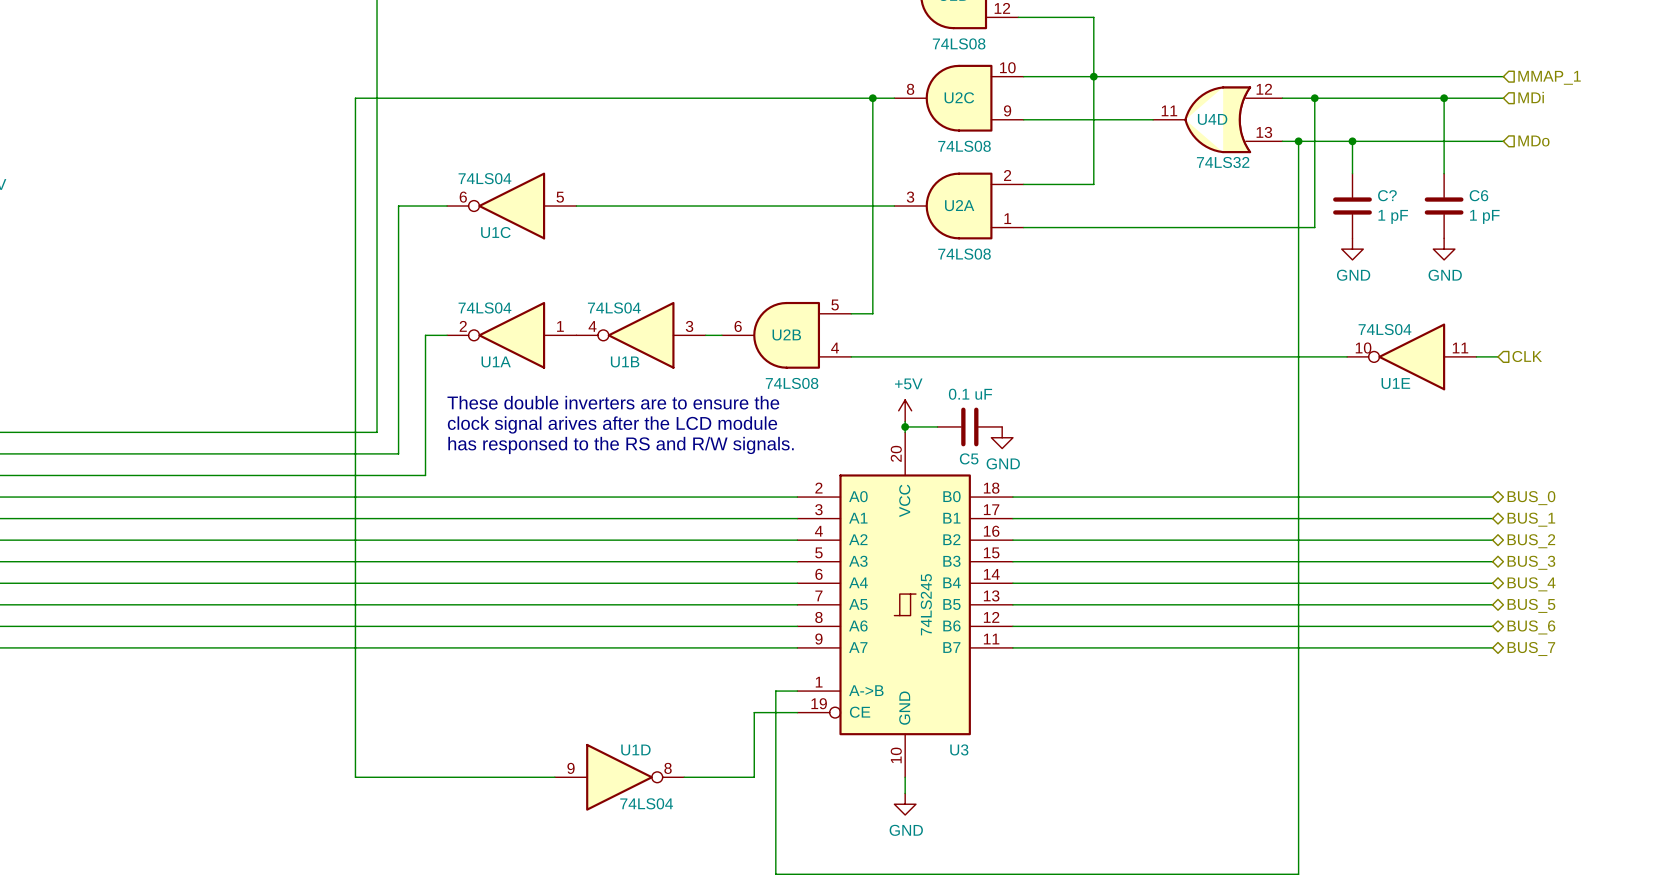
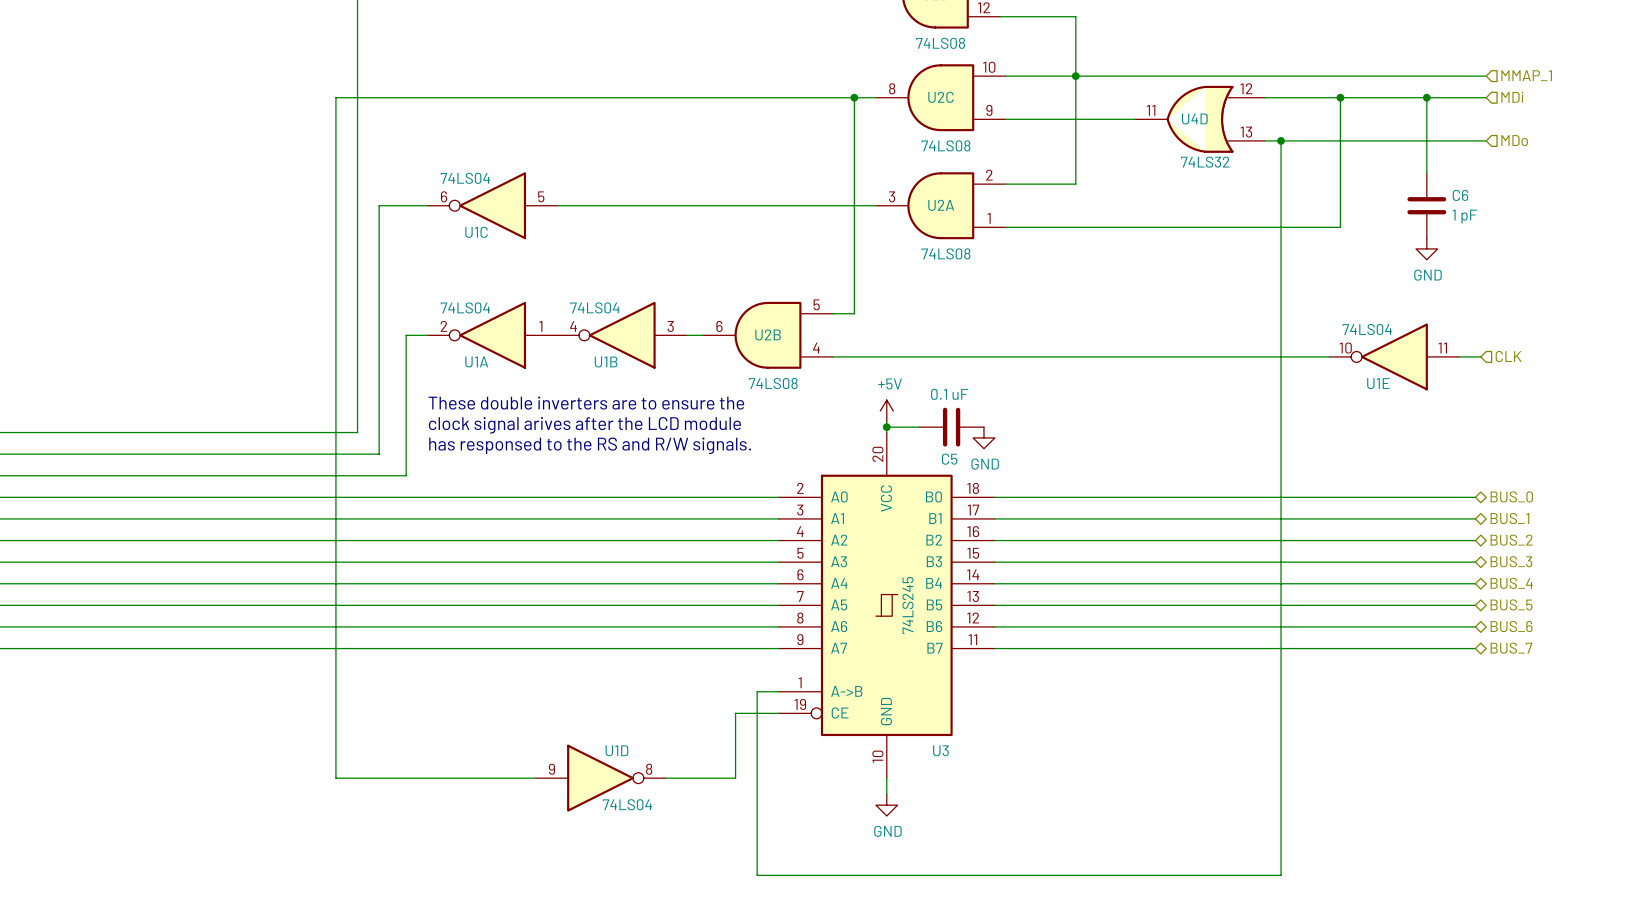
wire: (1314, 98) (1314, 227) -> (1340, 97) (1340, 227) (1297, 227)
junction: (1314, 98) -> none
junction: none -> (1340, 97)
wire: (1352, 141) (1352, 173) -> none
junction: (1352, 141) -> none
C?: 1 pF (1352, 206) -> none
power symbol: GND (1352, 249) -> none

